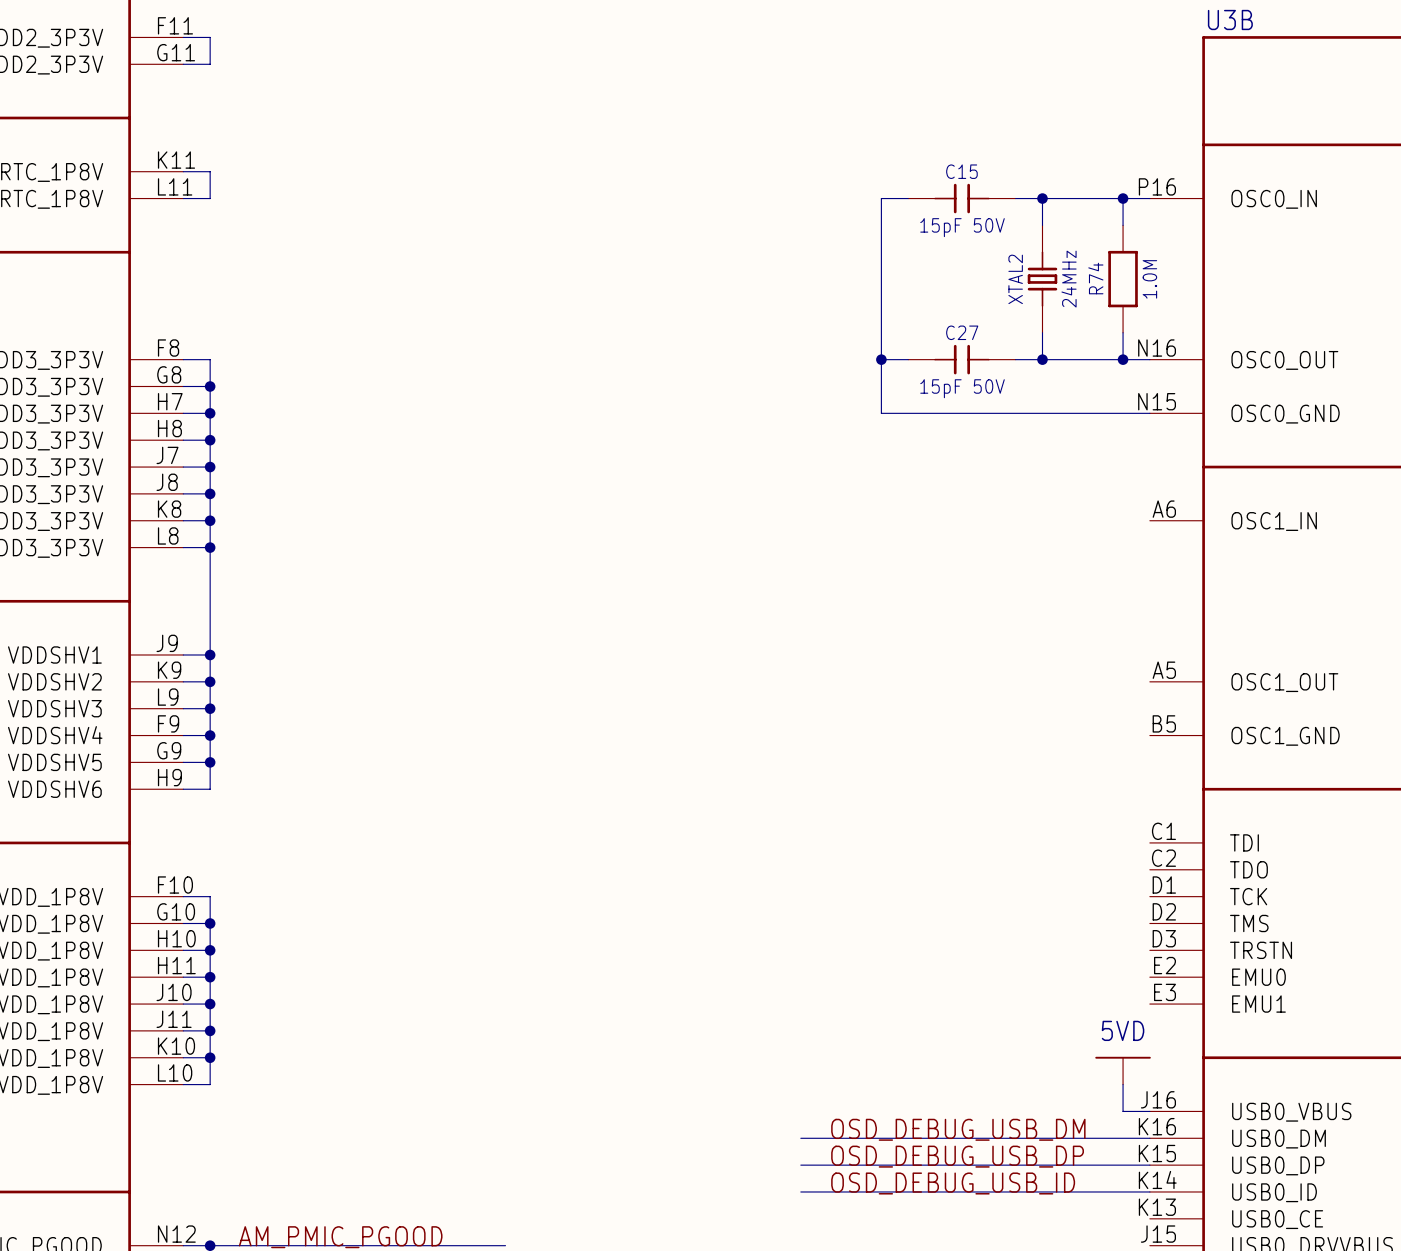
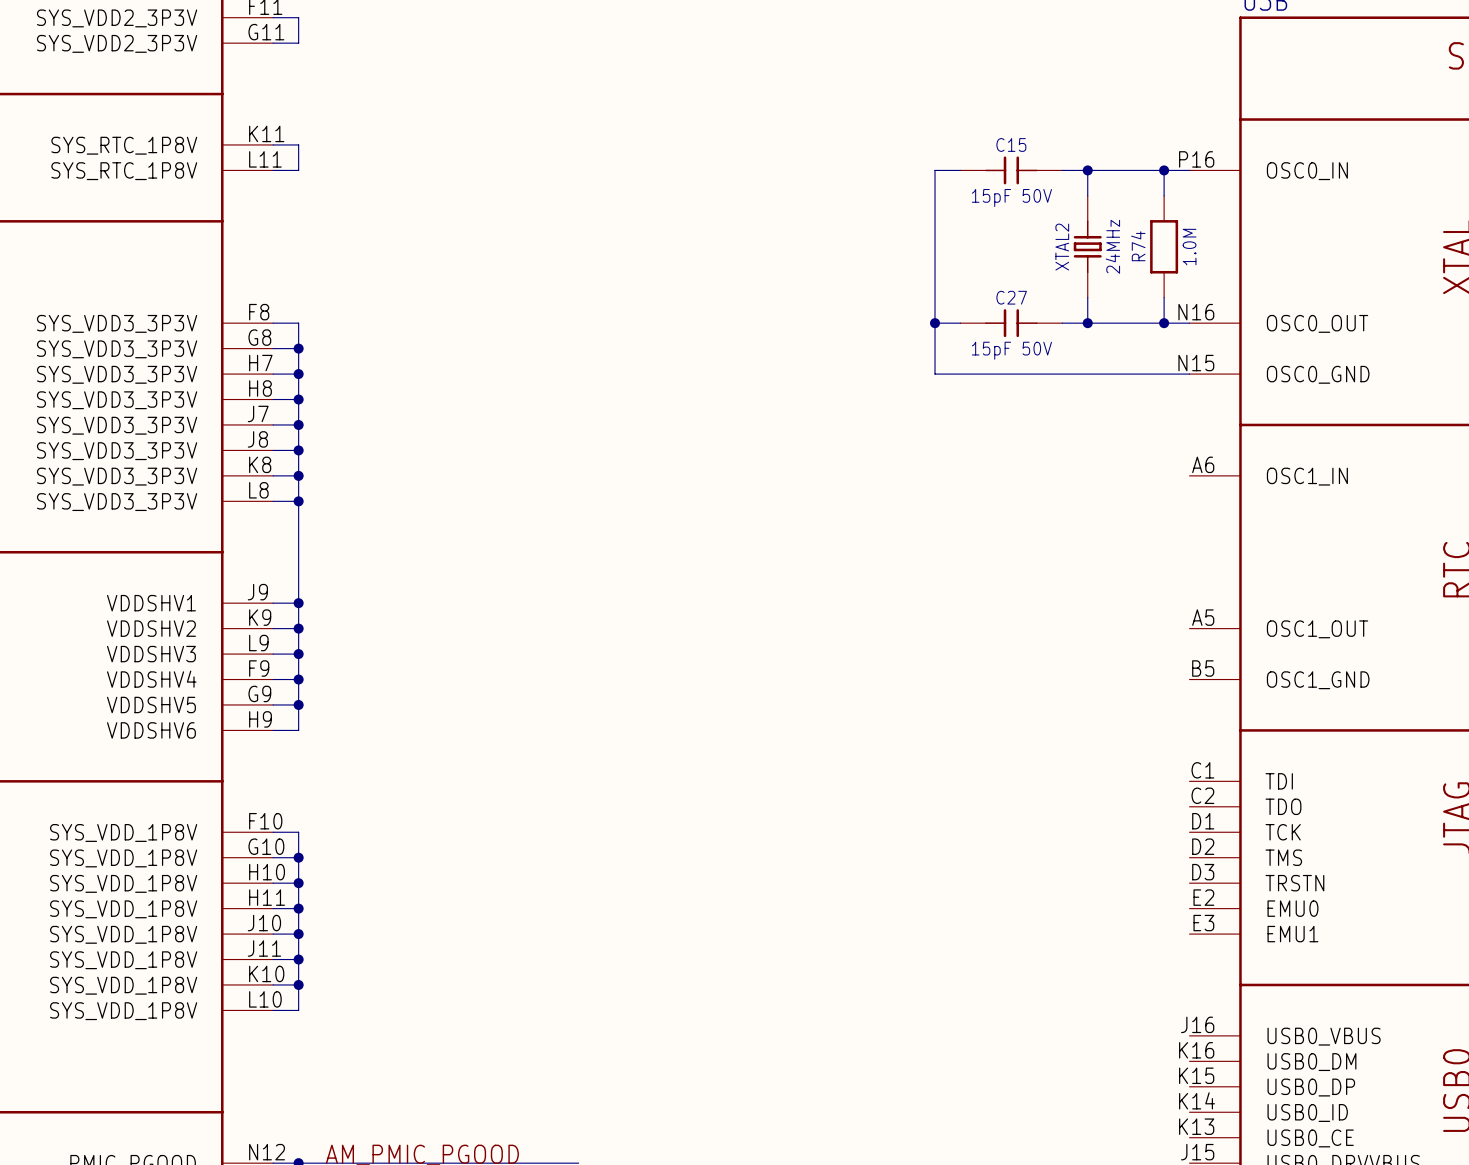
power symbol: 5VD (1123, 1070) -> none
wire: (1123, 1084) (1123, 1111) (1149, 1111) -> none
label: OSD_DEBUG_USB_DM (958, 1129) -> none
wire: (800, 1138) (1149, 1138) -> none
label: OSD_DEBUG_USB_DP (957, 1156) -> none
wire: (800, 1165) (1149, 1165) -> none
label: OSD_DEBUG_USB_ID (953, 1183) -> none
wire: (800, 1191) (1149, 1191) -> none

